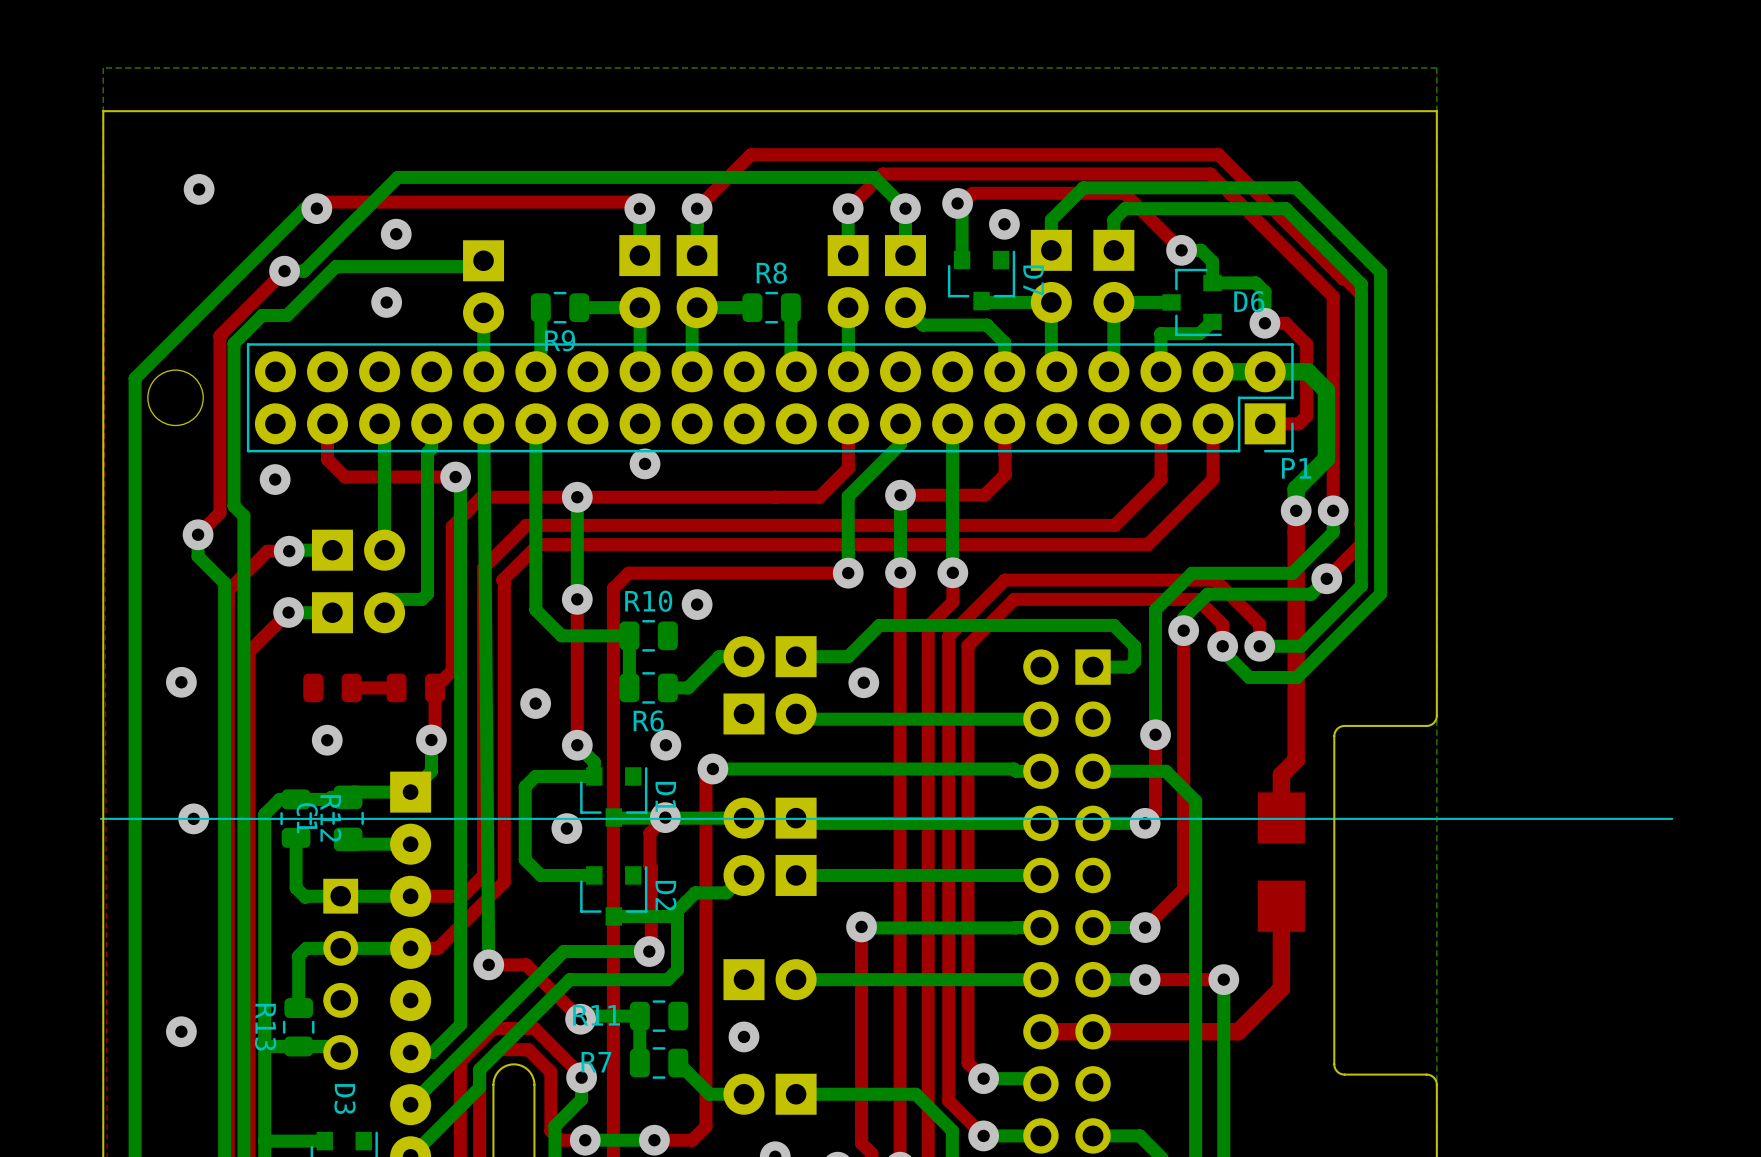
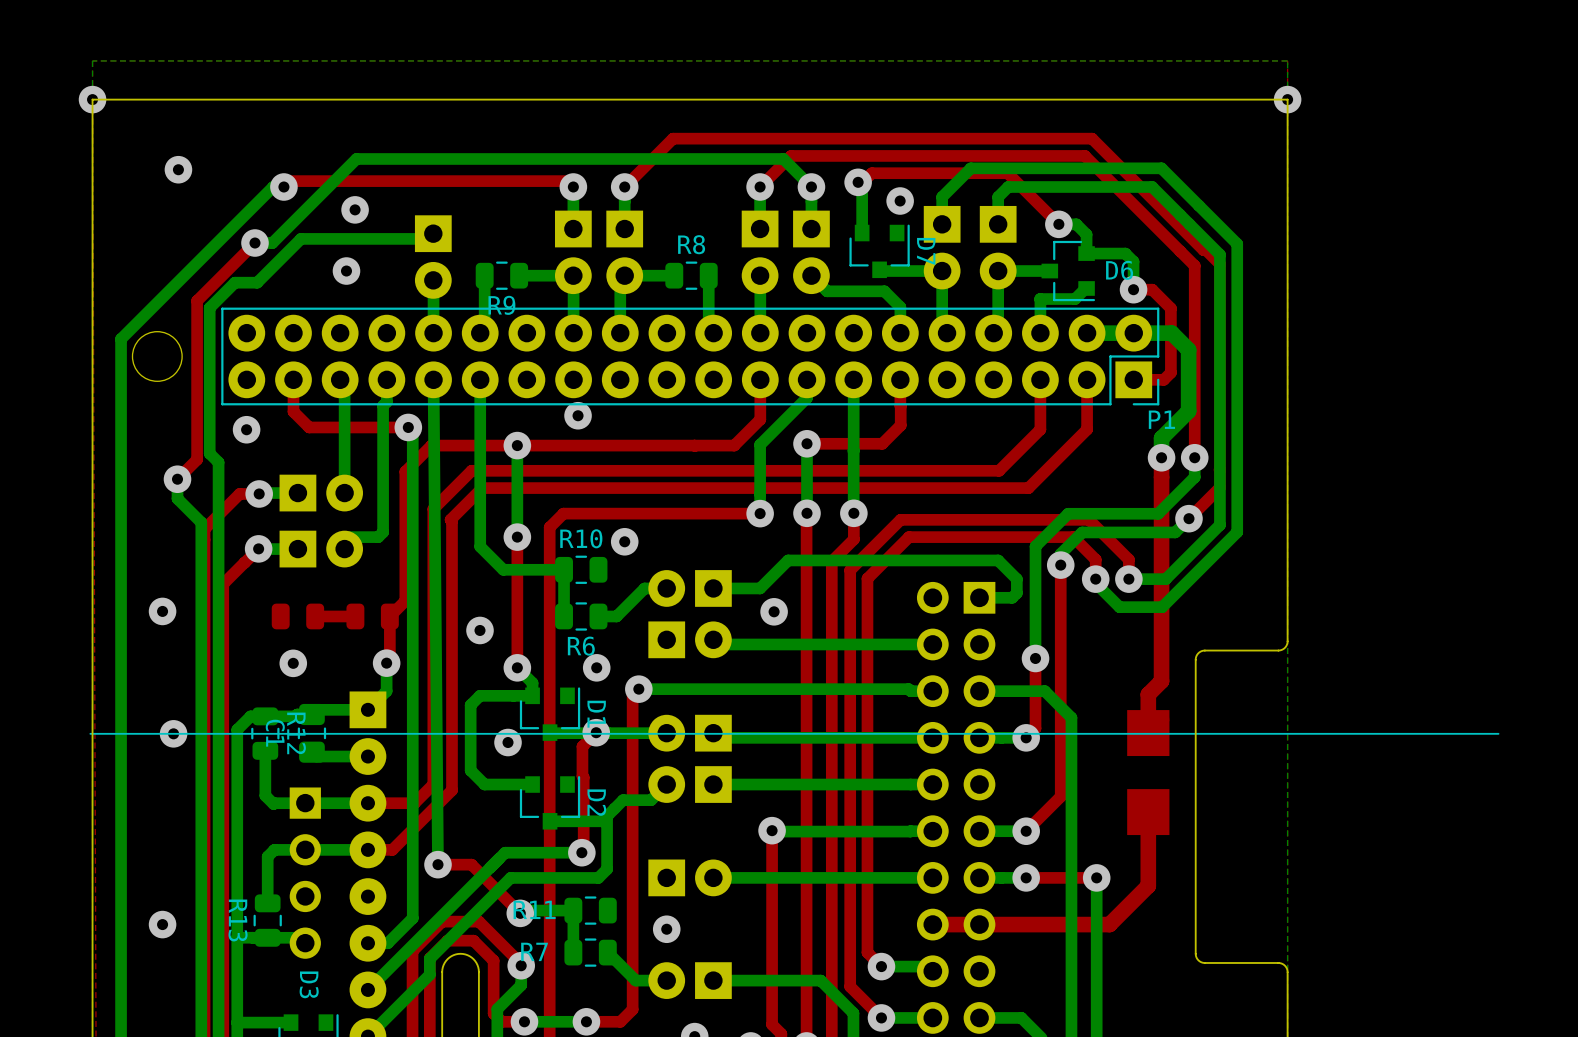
via: none -> (92, 99)
via: none -> (1287, 99)

